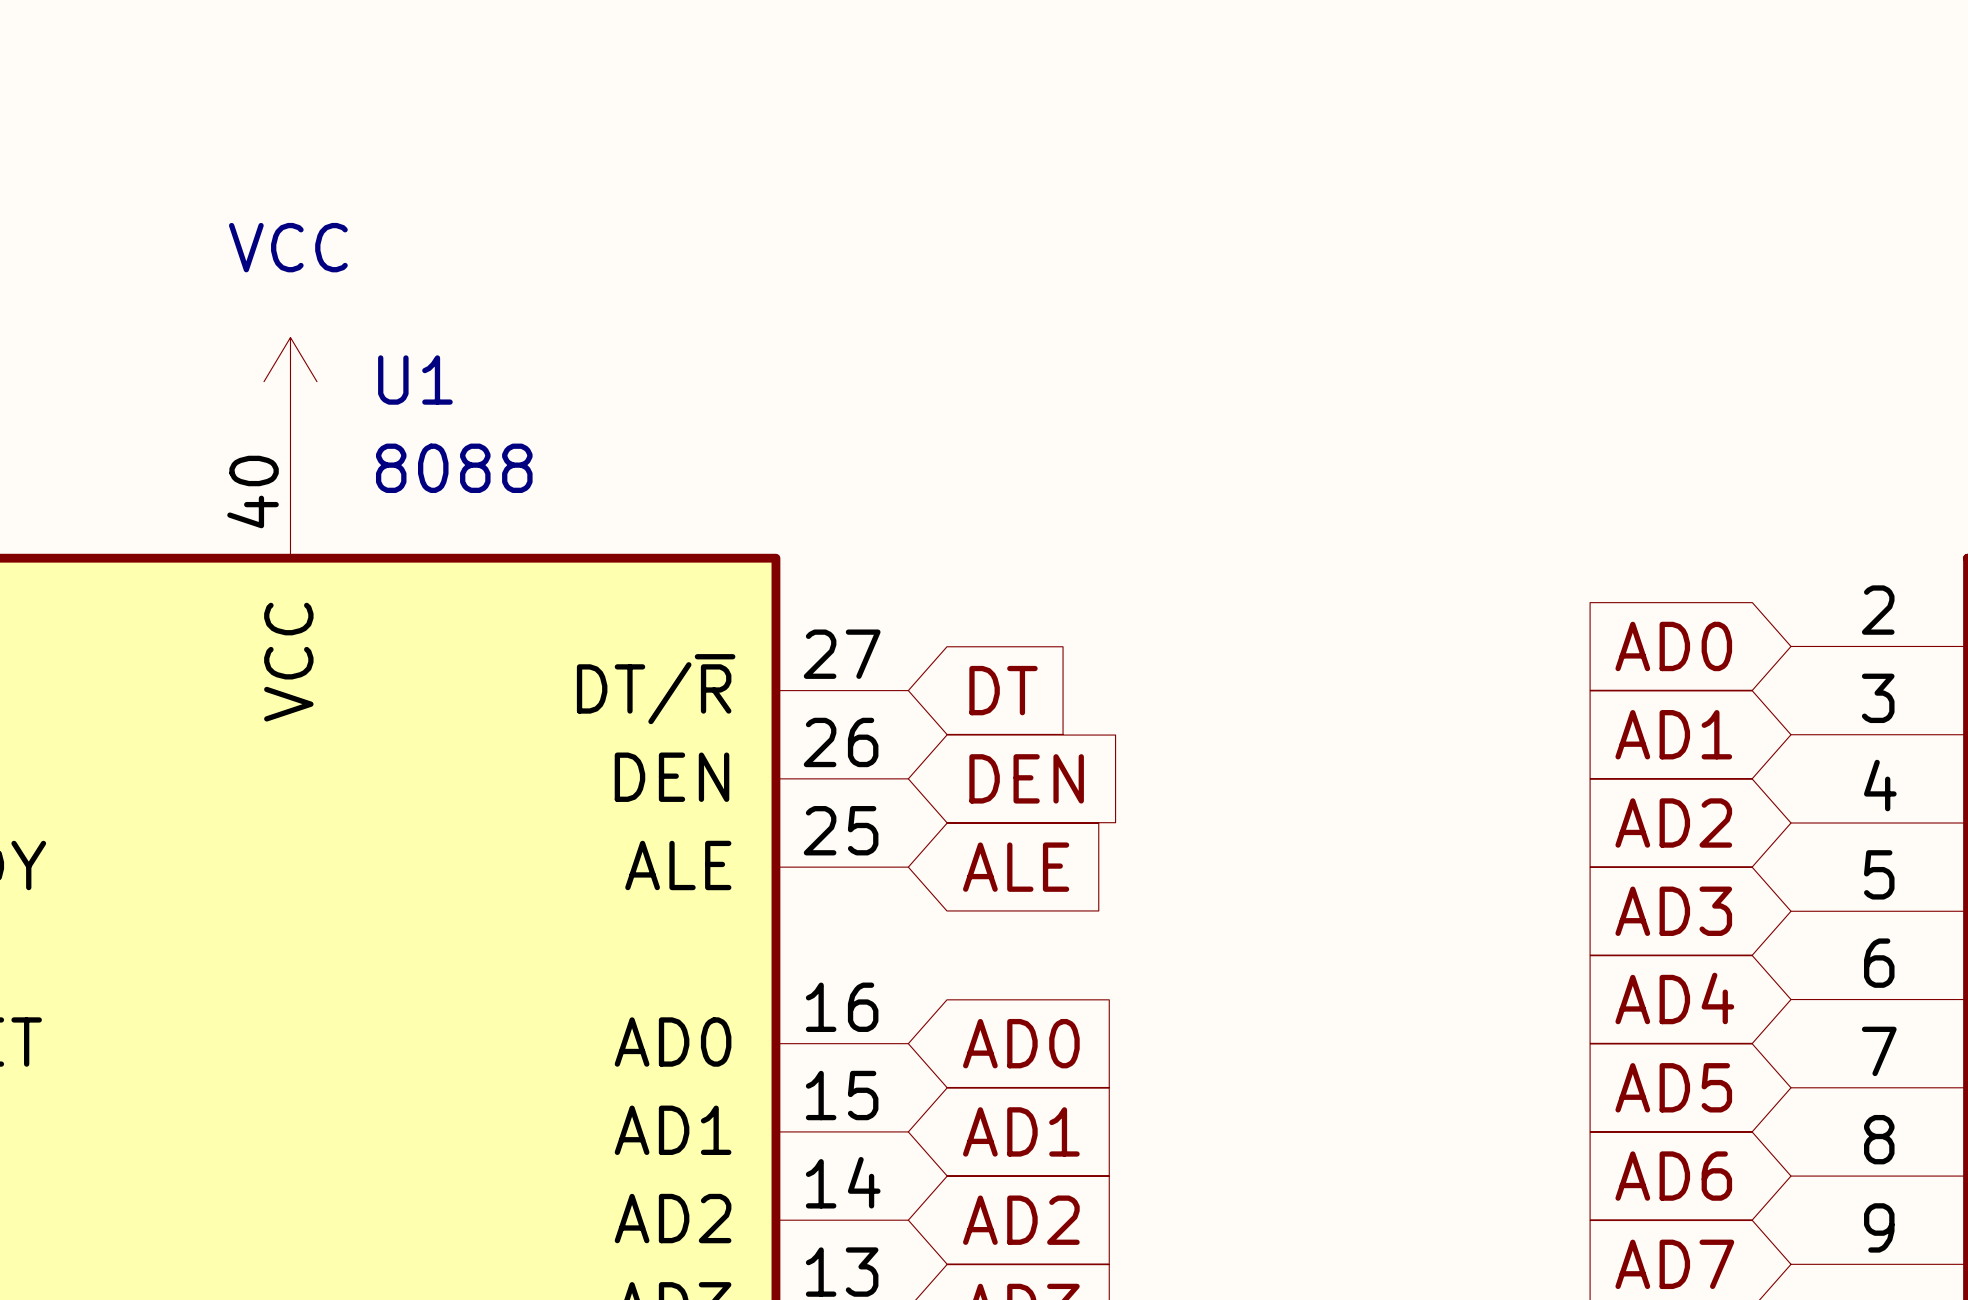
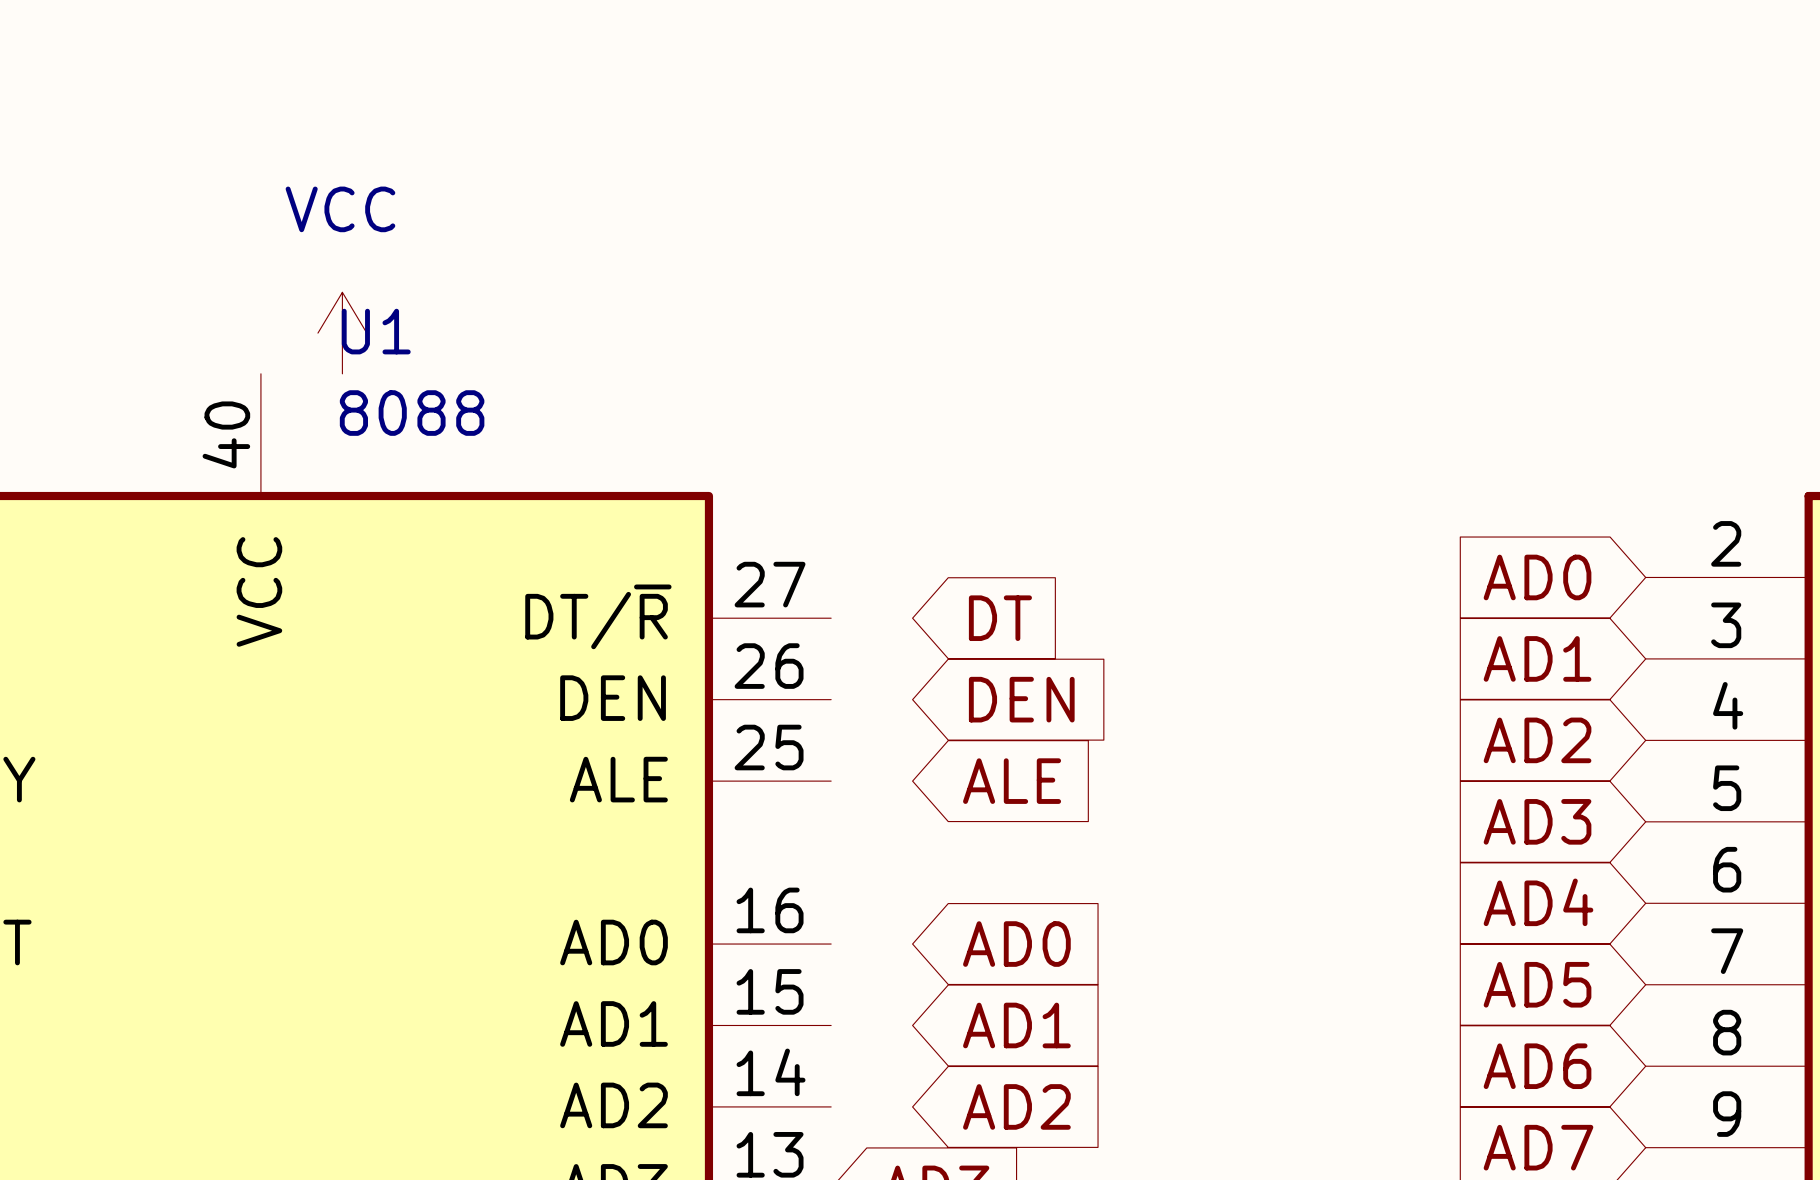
power symbol position: VCC (290, 381) -> VCC (342, 333)
global label position: DT (1003, 690) -> DT (1000, 618)
global label position: DEN (1026, 778) -> DEN (1021, 699)
global label position: ALE (1016, 867) -> ALE (1012, 781)
global label position: AD0 (1021, 1043) -> AD0 (1016, 944)
global label position: AD1 (1021, 1131) -> AD1 (1016, 1025)
global label position: AD2 (1021, 1220) -> AD2 (1016, 1106)

